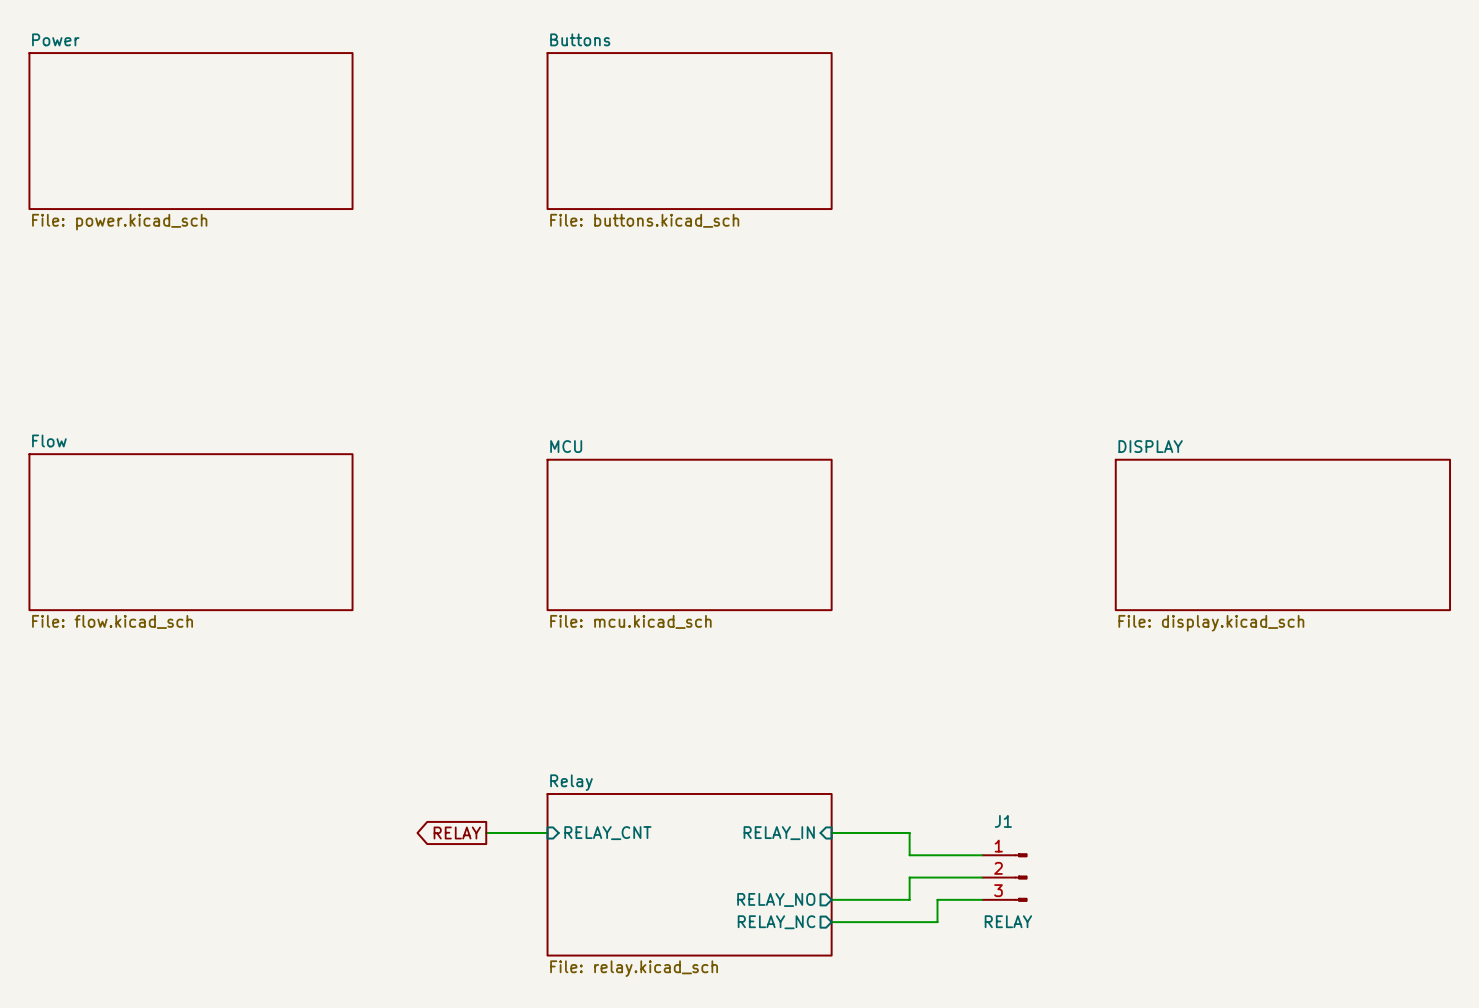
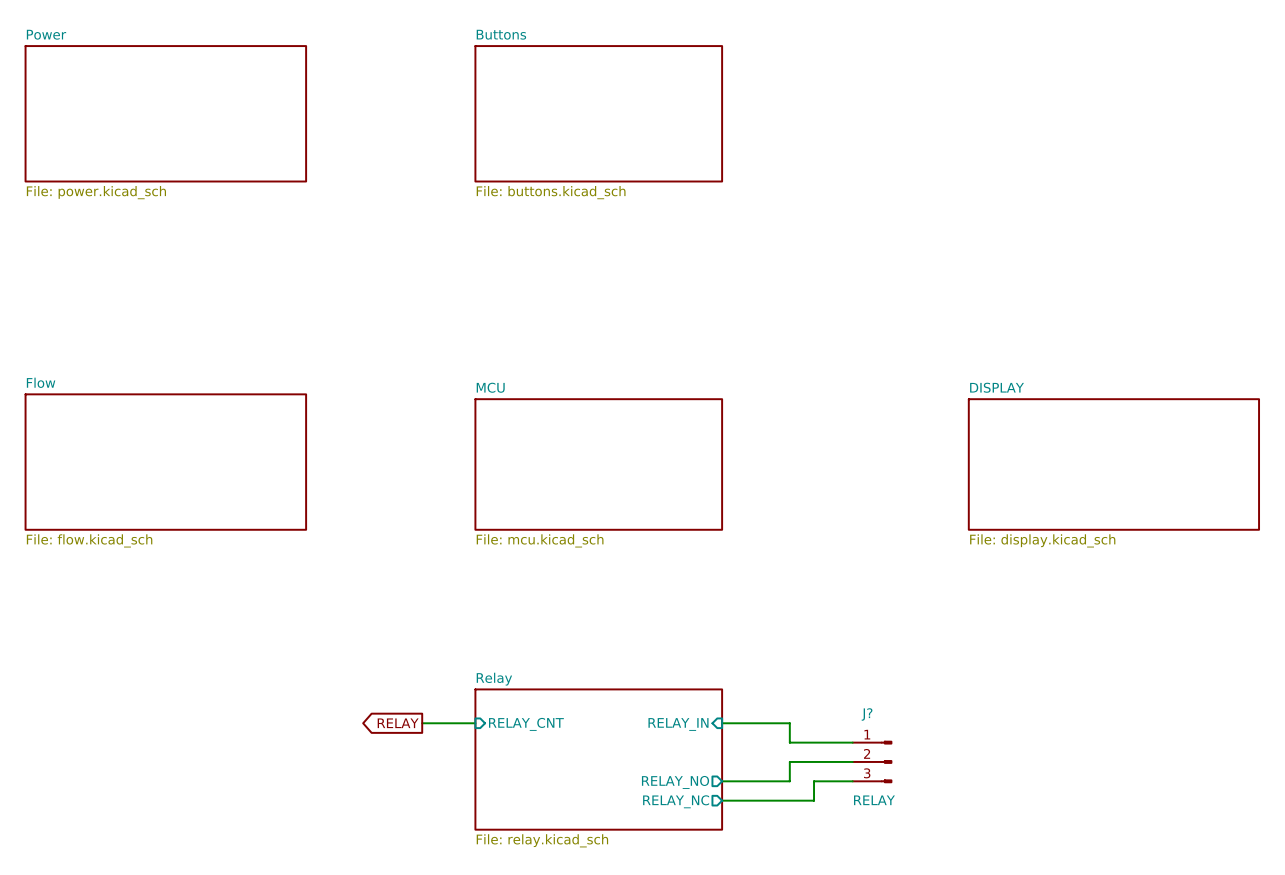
J1 name: J1 (1003, 821) -> J? (867, 714)

